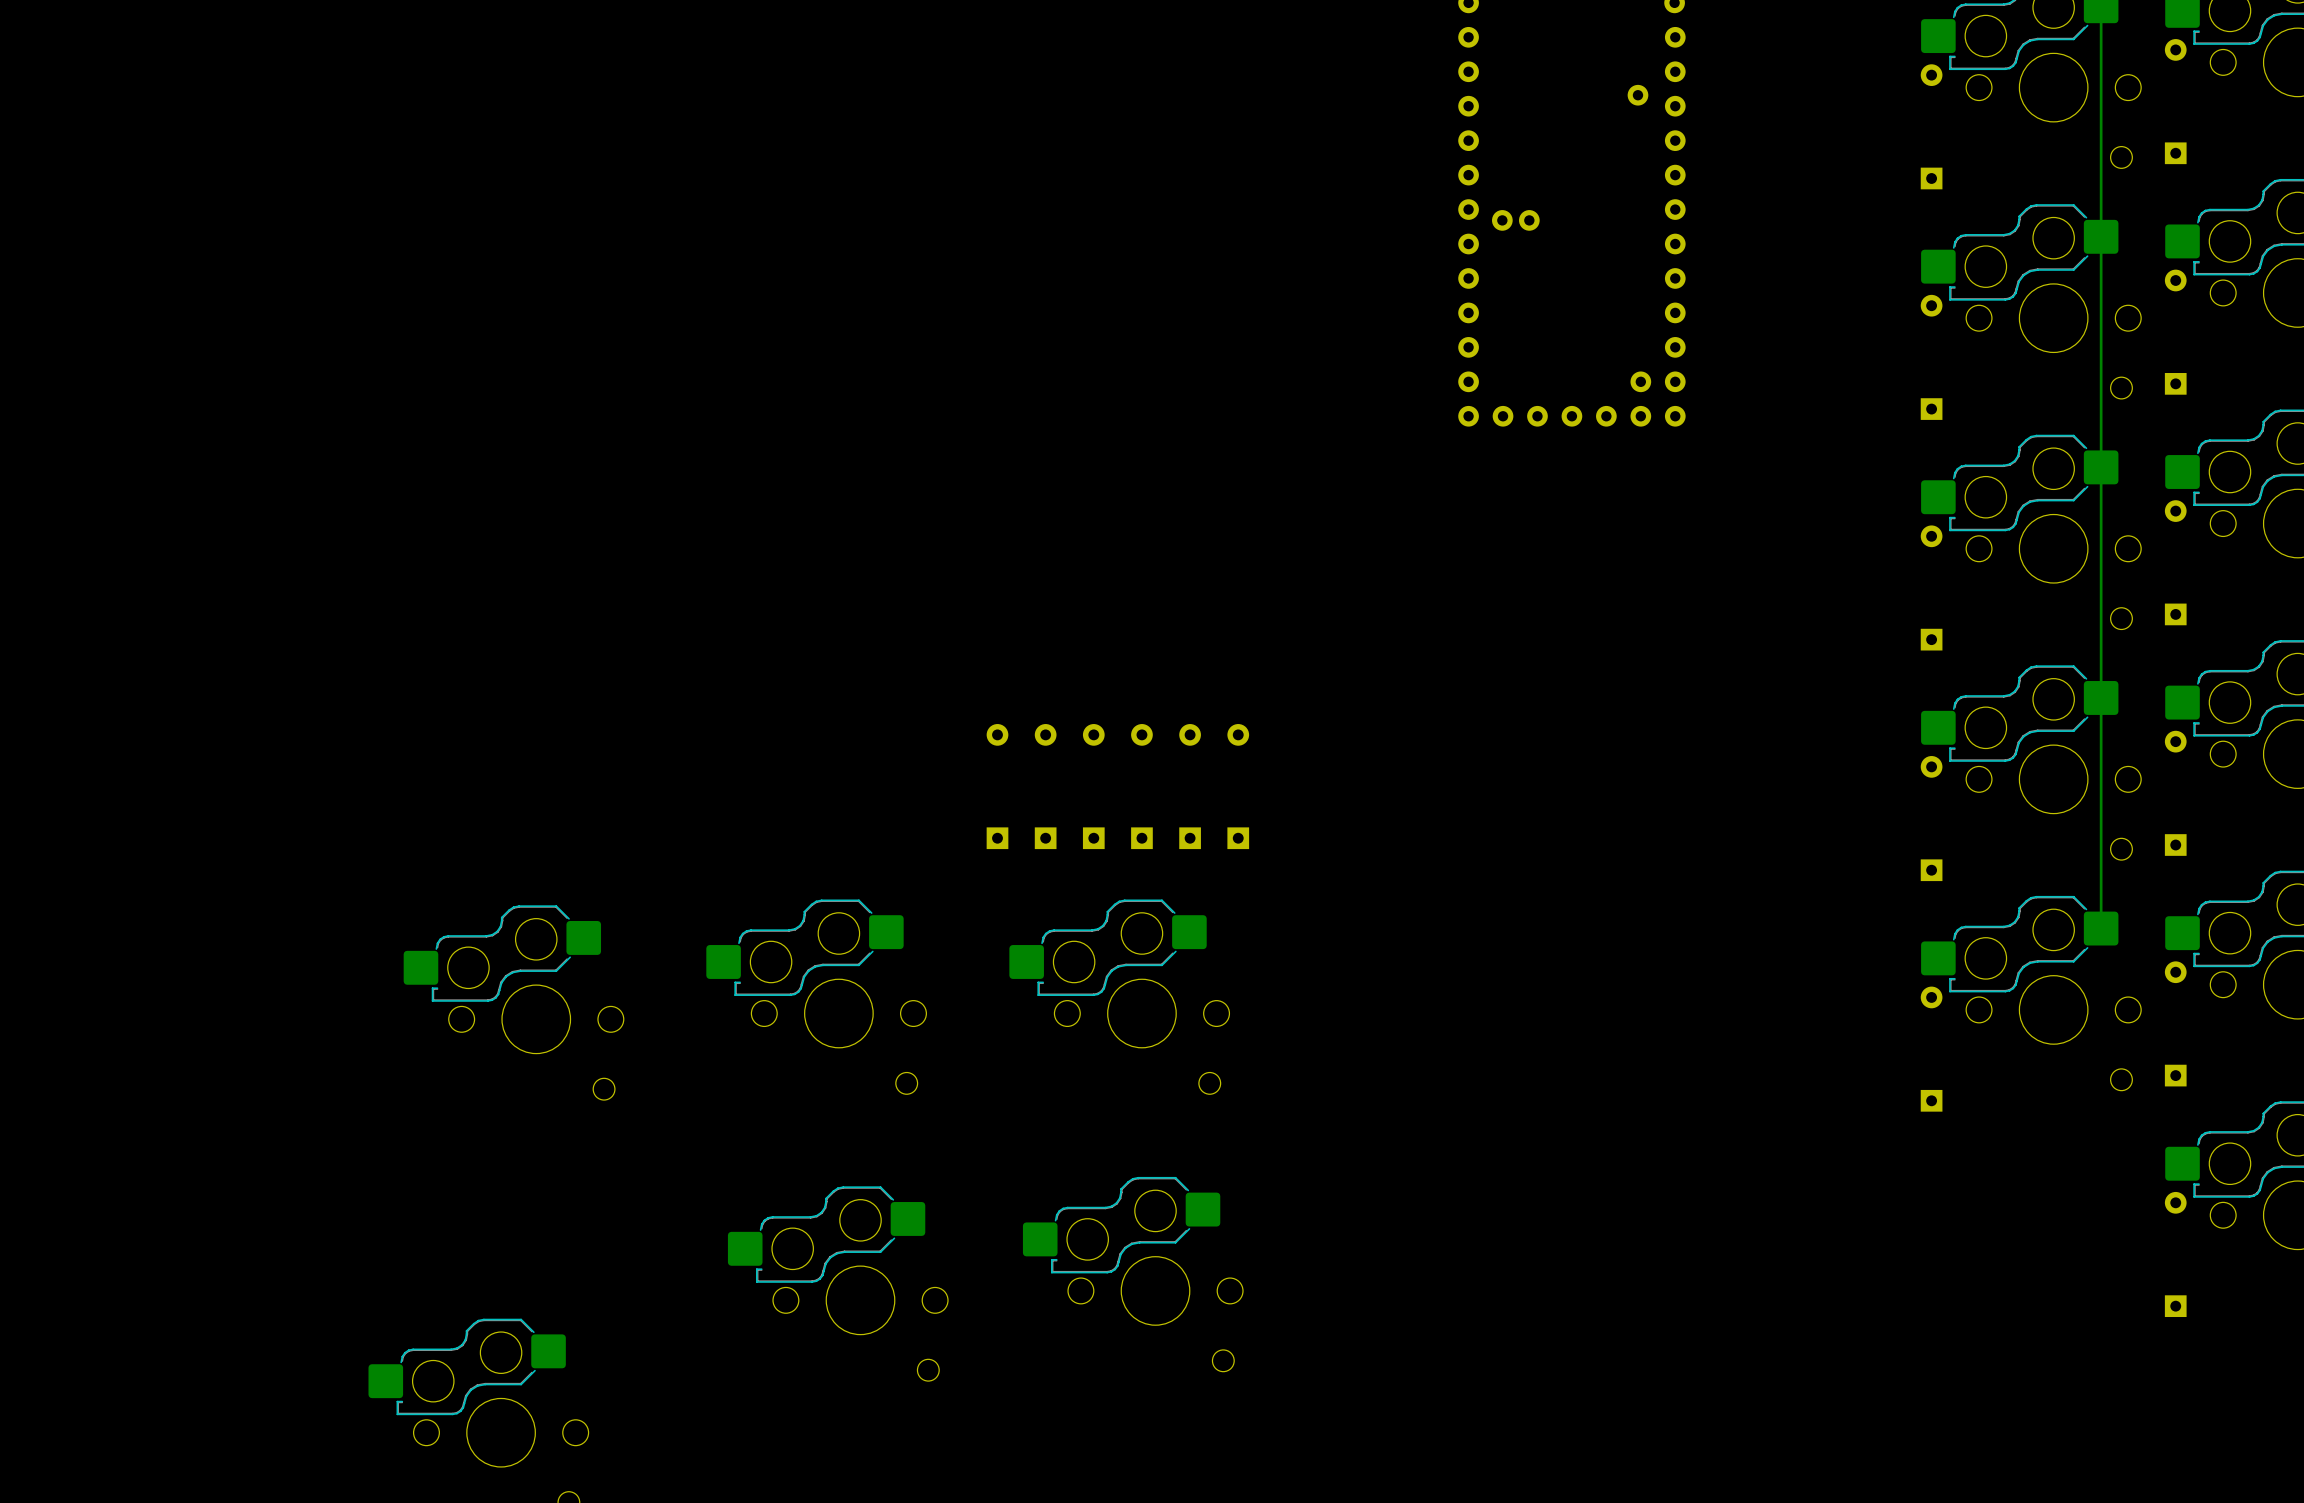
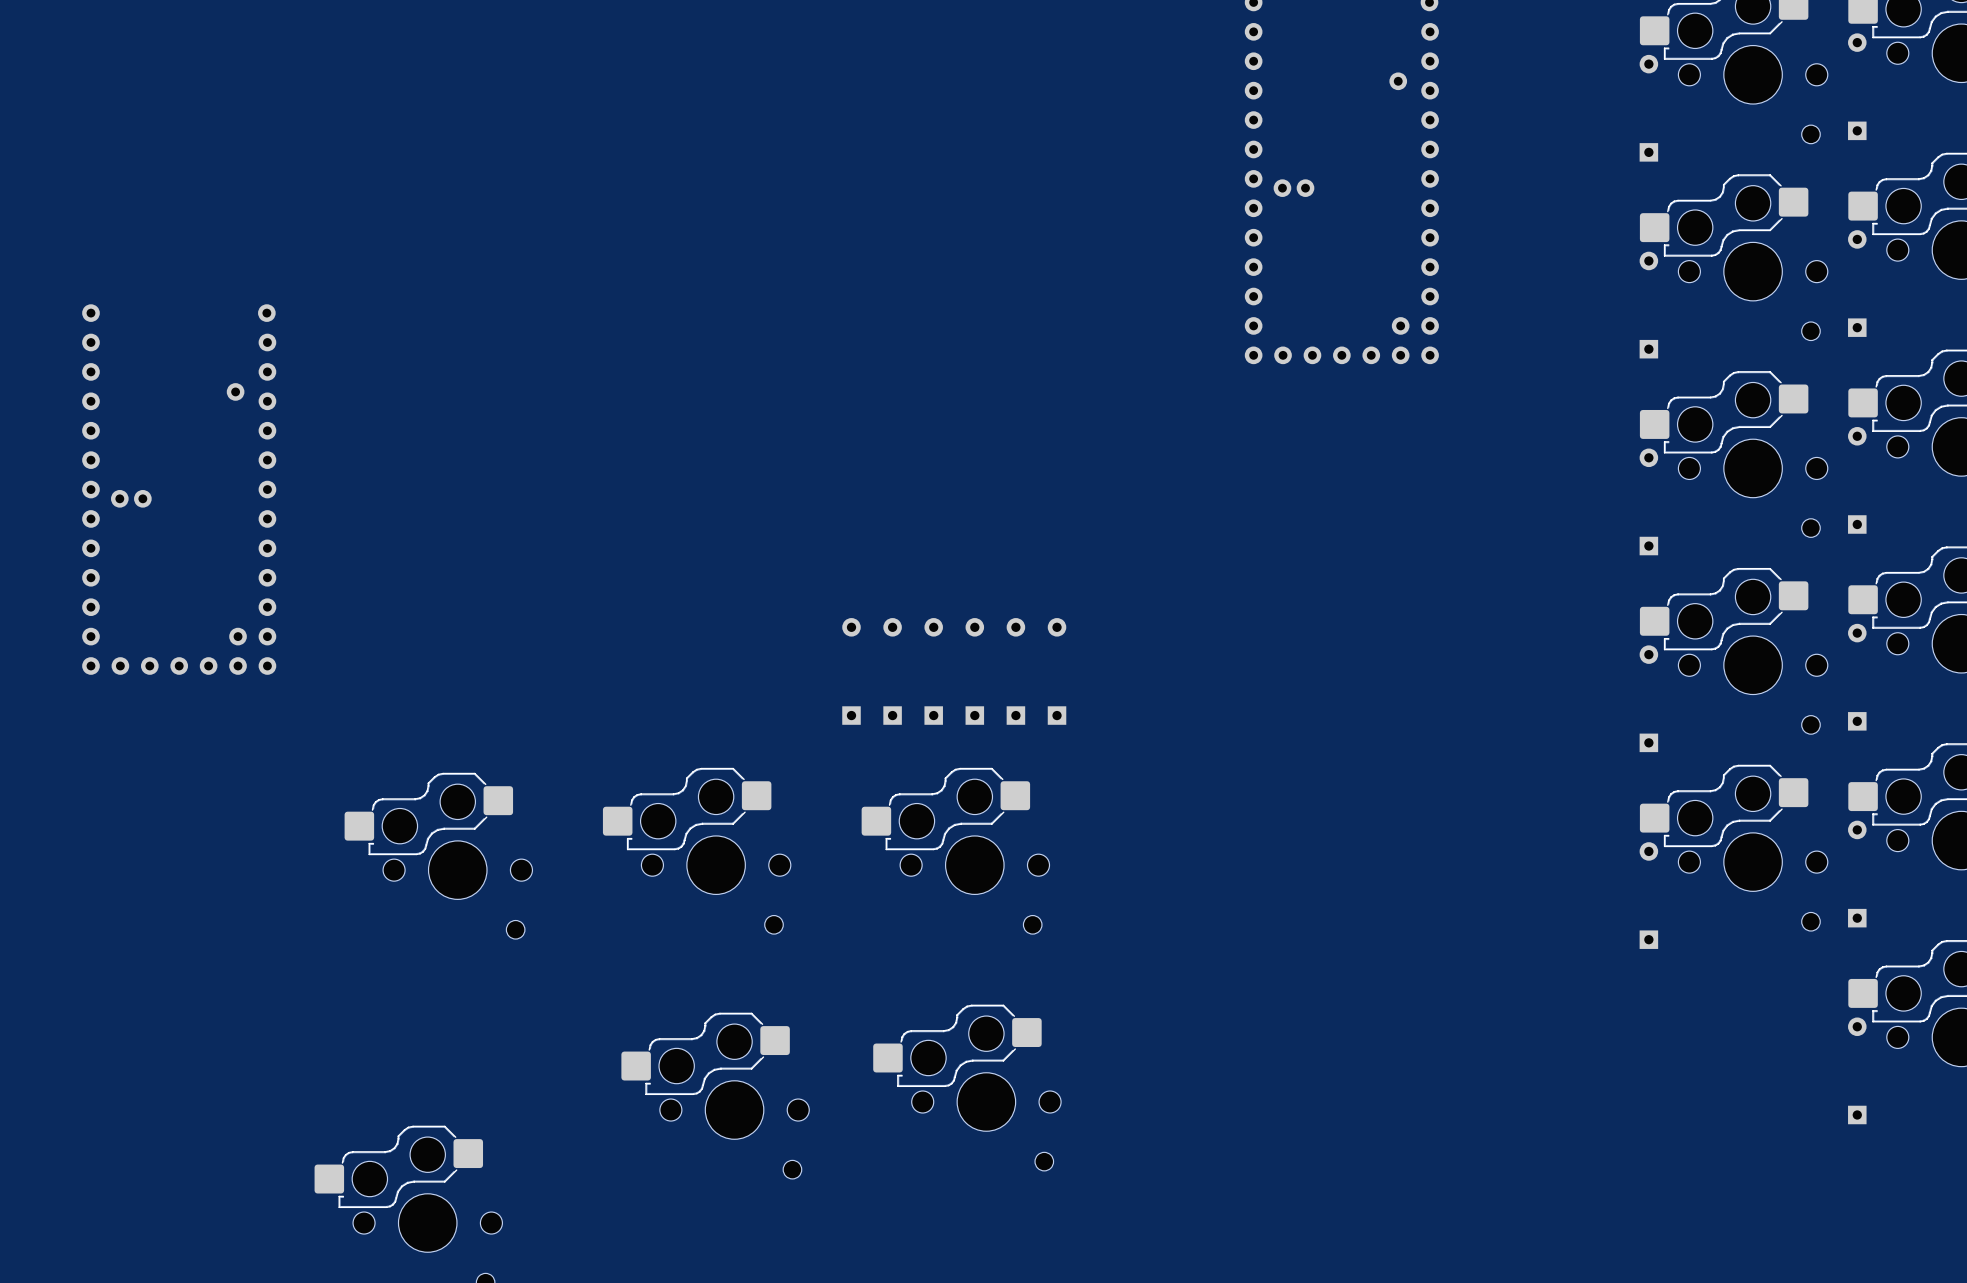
track: (2101, 6) (2101, 928) -> none
part: none -> (179, 489)

